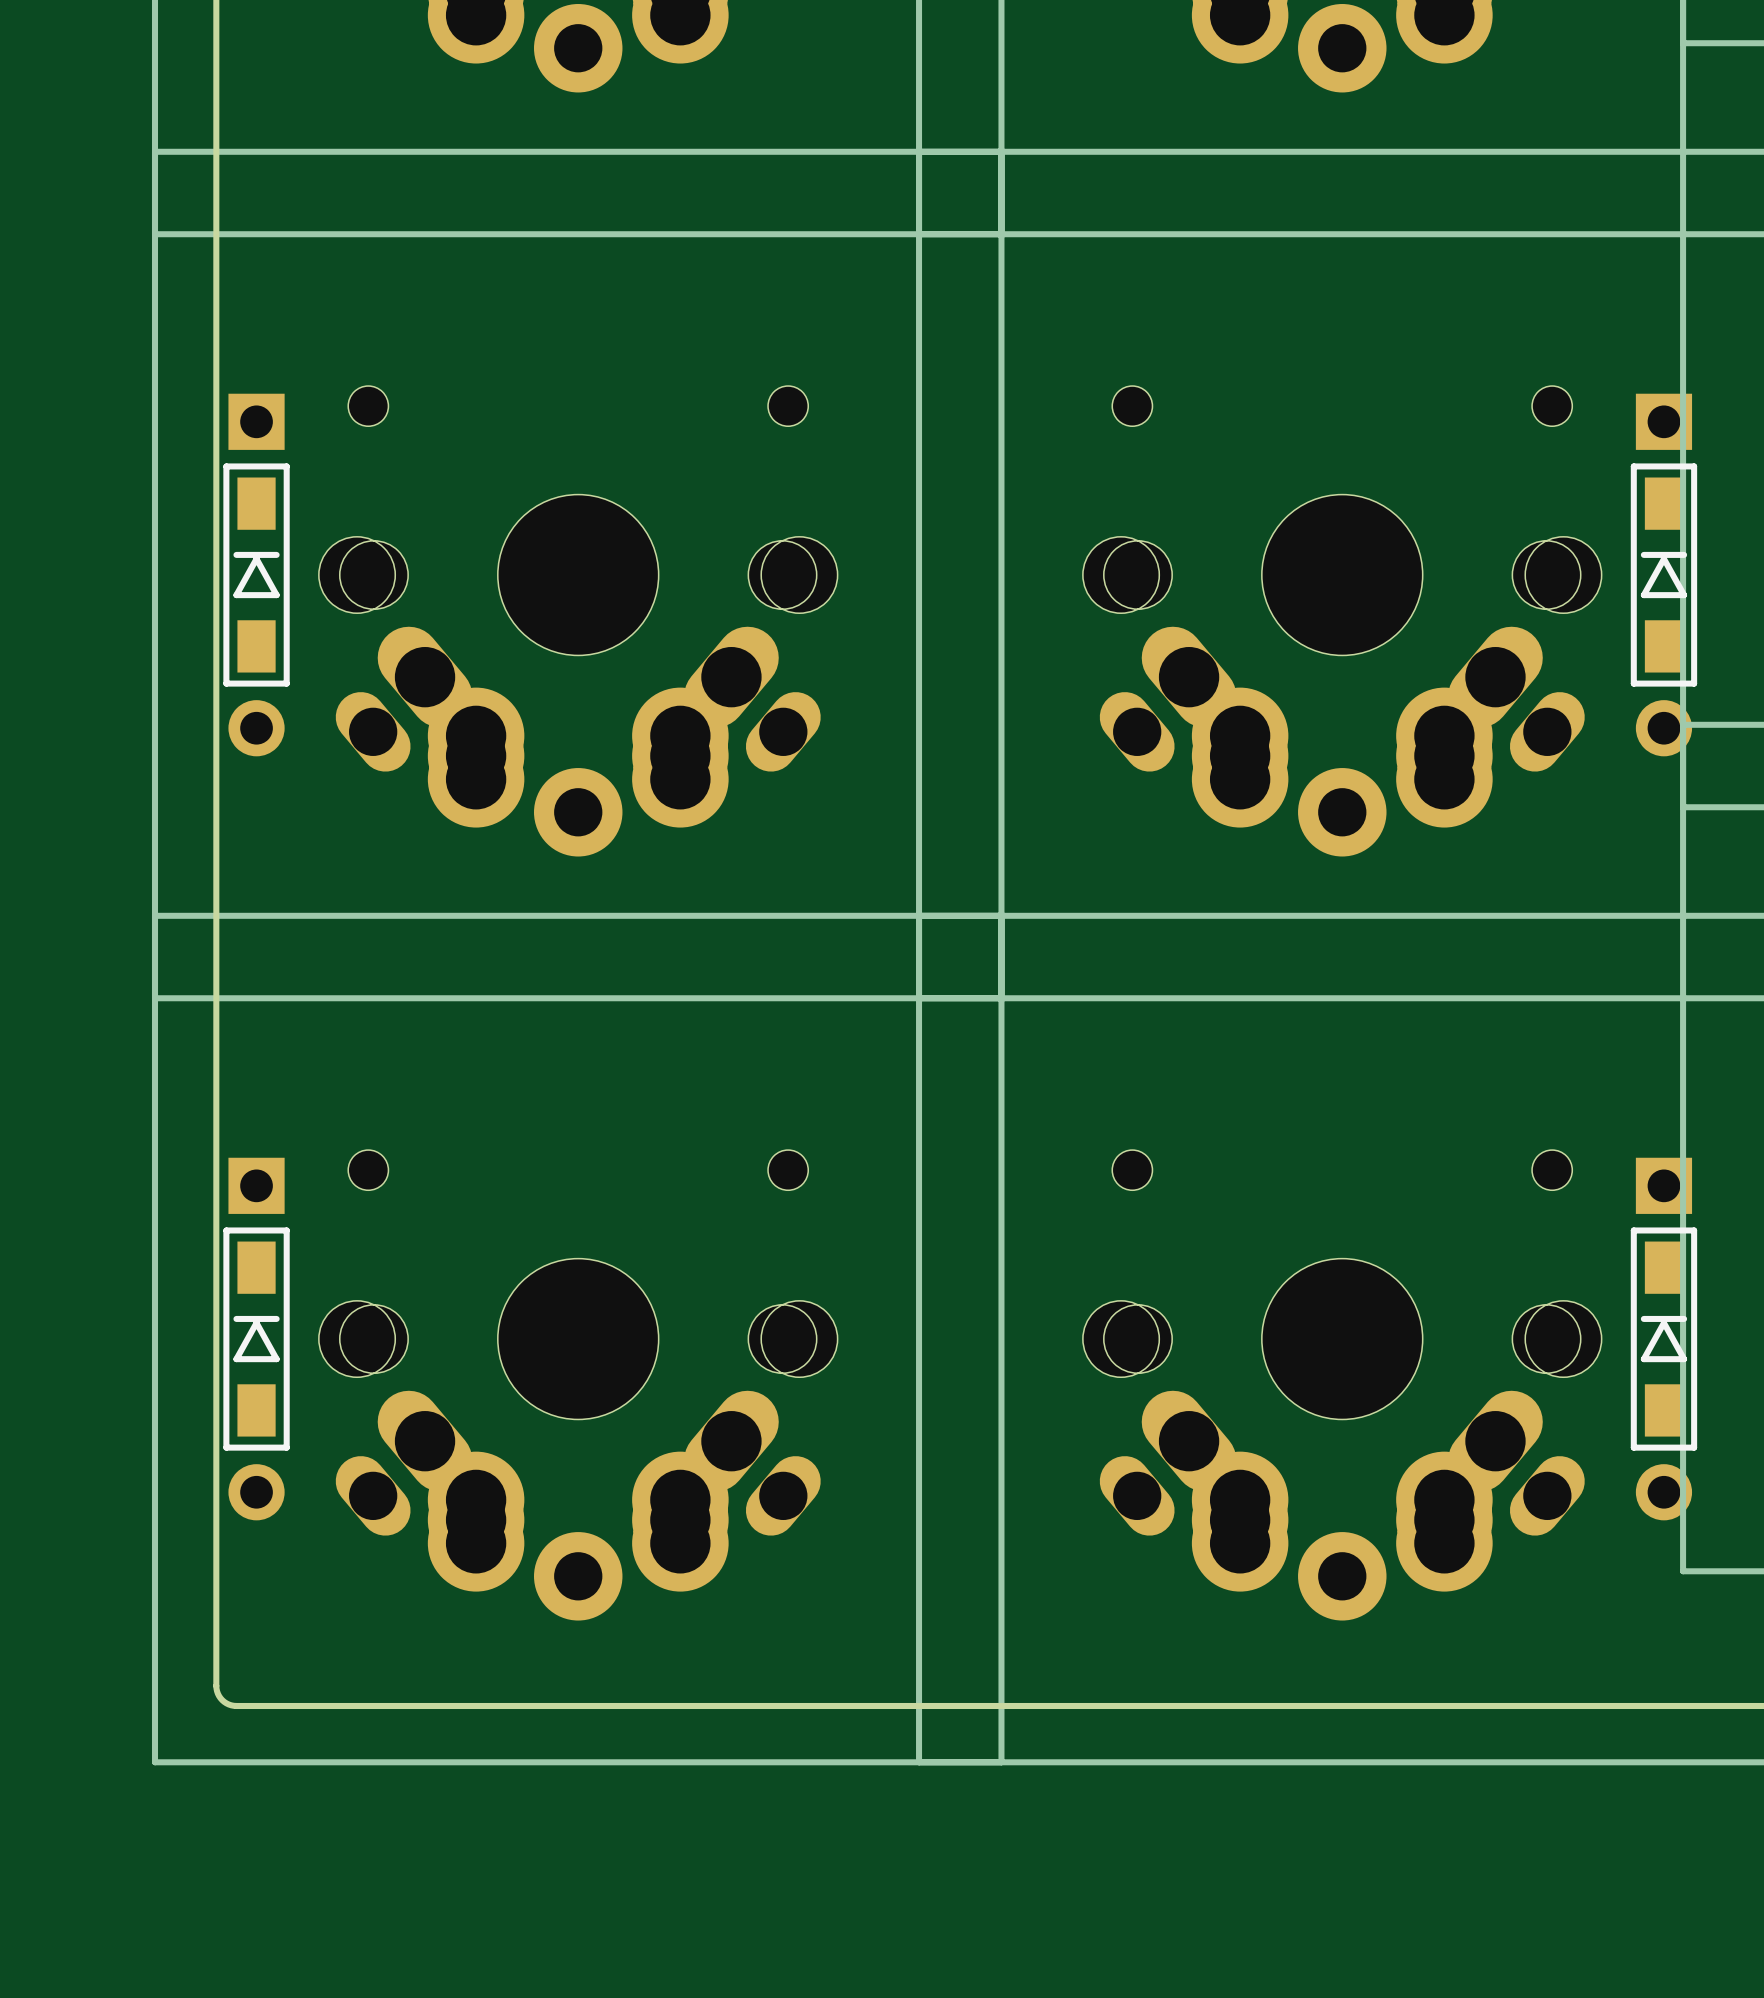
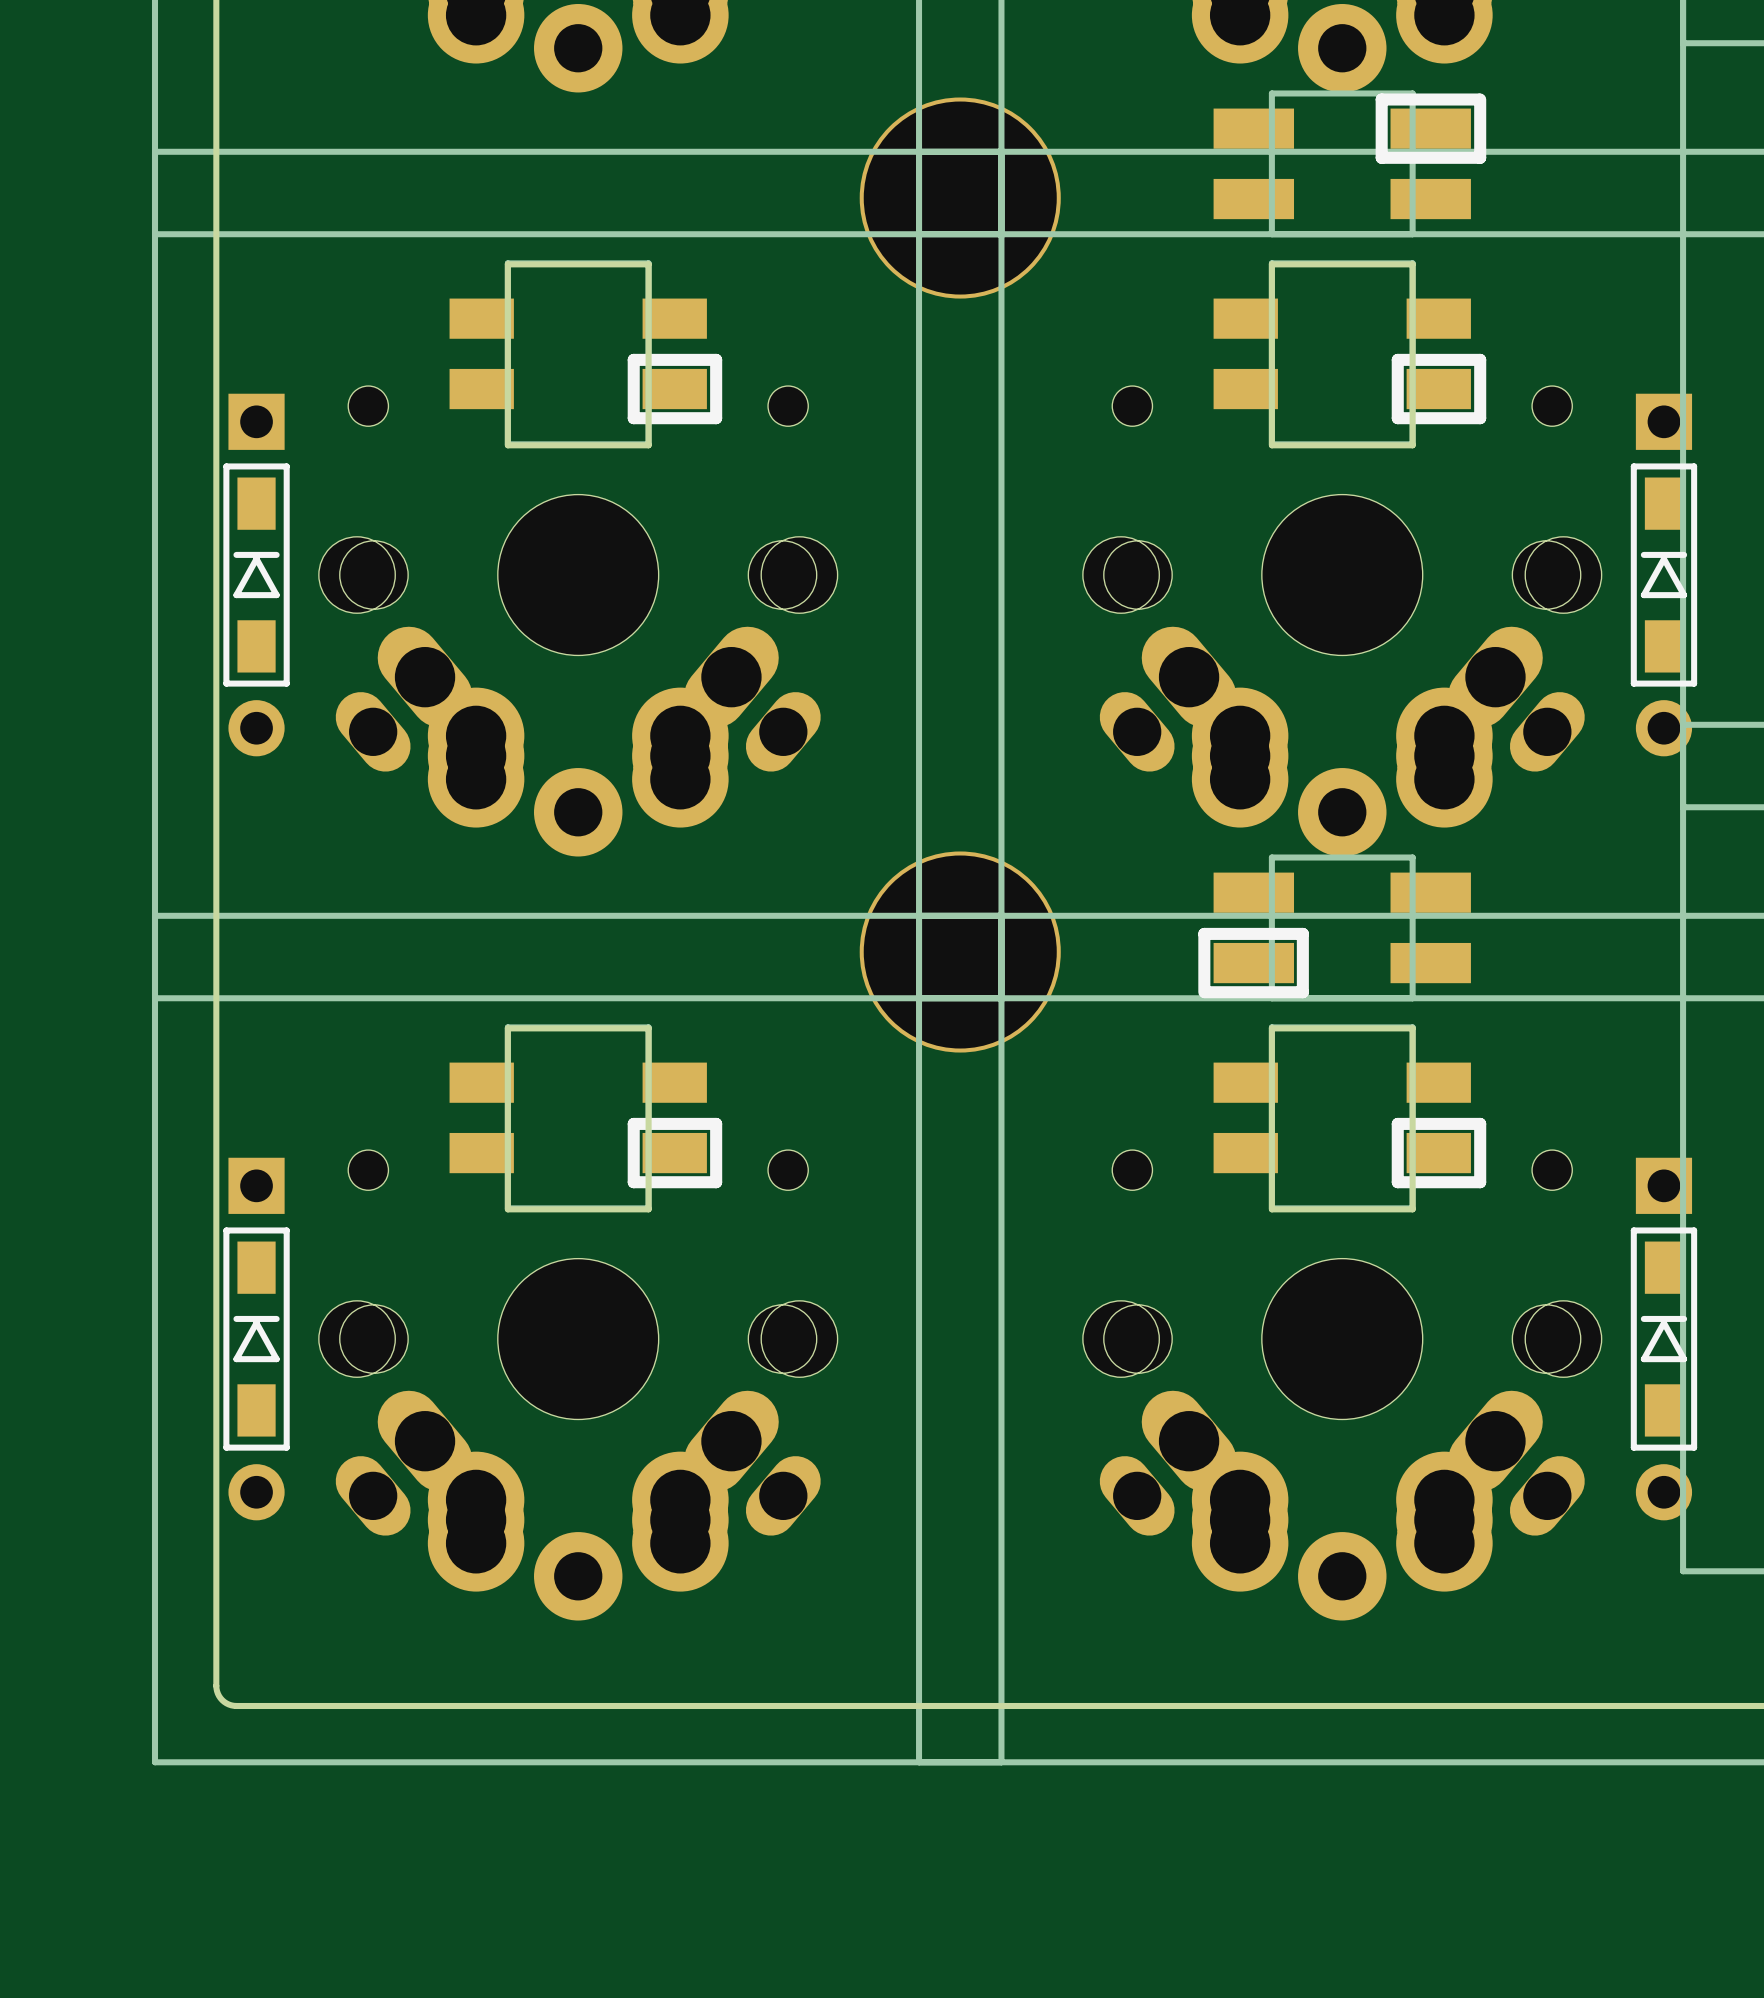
part: none -> (1349, 163)
part: none -> (960, 198)
board edge: none -> (507, 264) (507, 445) (648, 445) (648, 264) (507, 264)
board edge: none -> (1271, 264) (1271, 445) (1412, 445) (1412, 264) (1271, 264)
part: none -> (585, 353)
part: none -> (1349, 353)
part: none -> (1334, 927)
part: none -> (960, 952)
board edge: none -> (507, 1028) (648, 1028) (648, 1209) (507, 1209) (507, 1028)
board edge: none -> (1271, 1028) (1412, 1028) (1412, 1209) (1271, 1209) (1271, 1028)
part: none -> (585, 1117)
part: none -> (1349, 1117)

